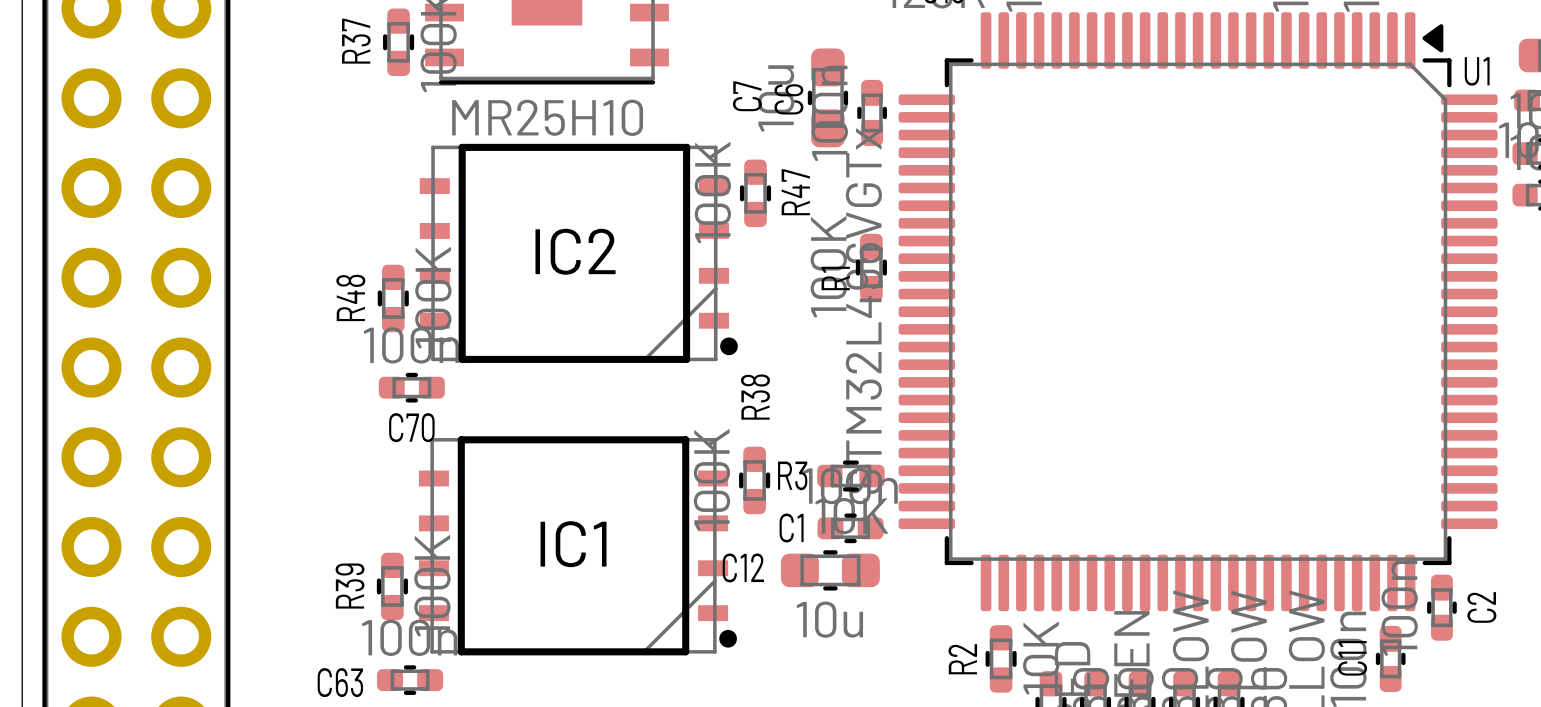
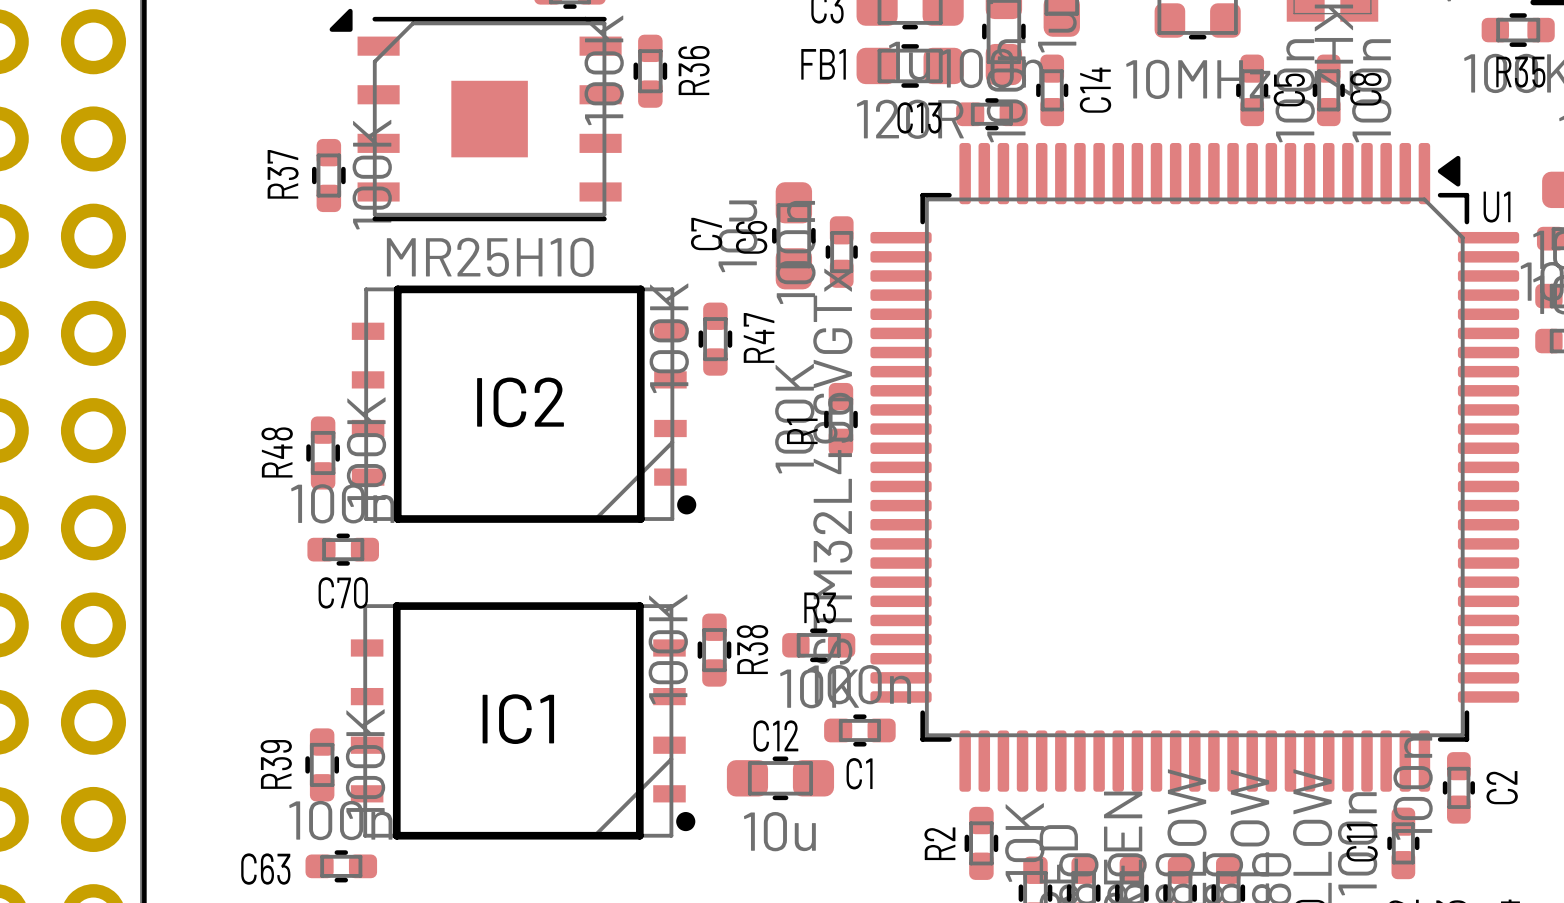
R38 name position: R38 (755, 397) -> R38 (752, 649)
R3 name position: R3 (792, 475) -> R3 (820, 607)
C1 name position: C1 (791, 528) -> C1 (859, 773)
C1 position: (850, 528) -> (859, 730)
C12 name position: C12 (743, 567) -> C12 (775, 736)
C12 position: (830, 570) -> (780, 778)

